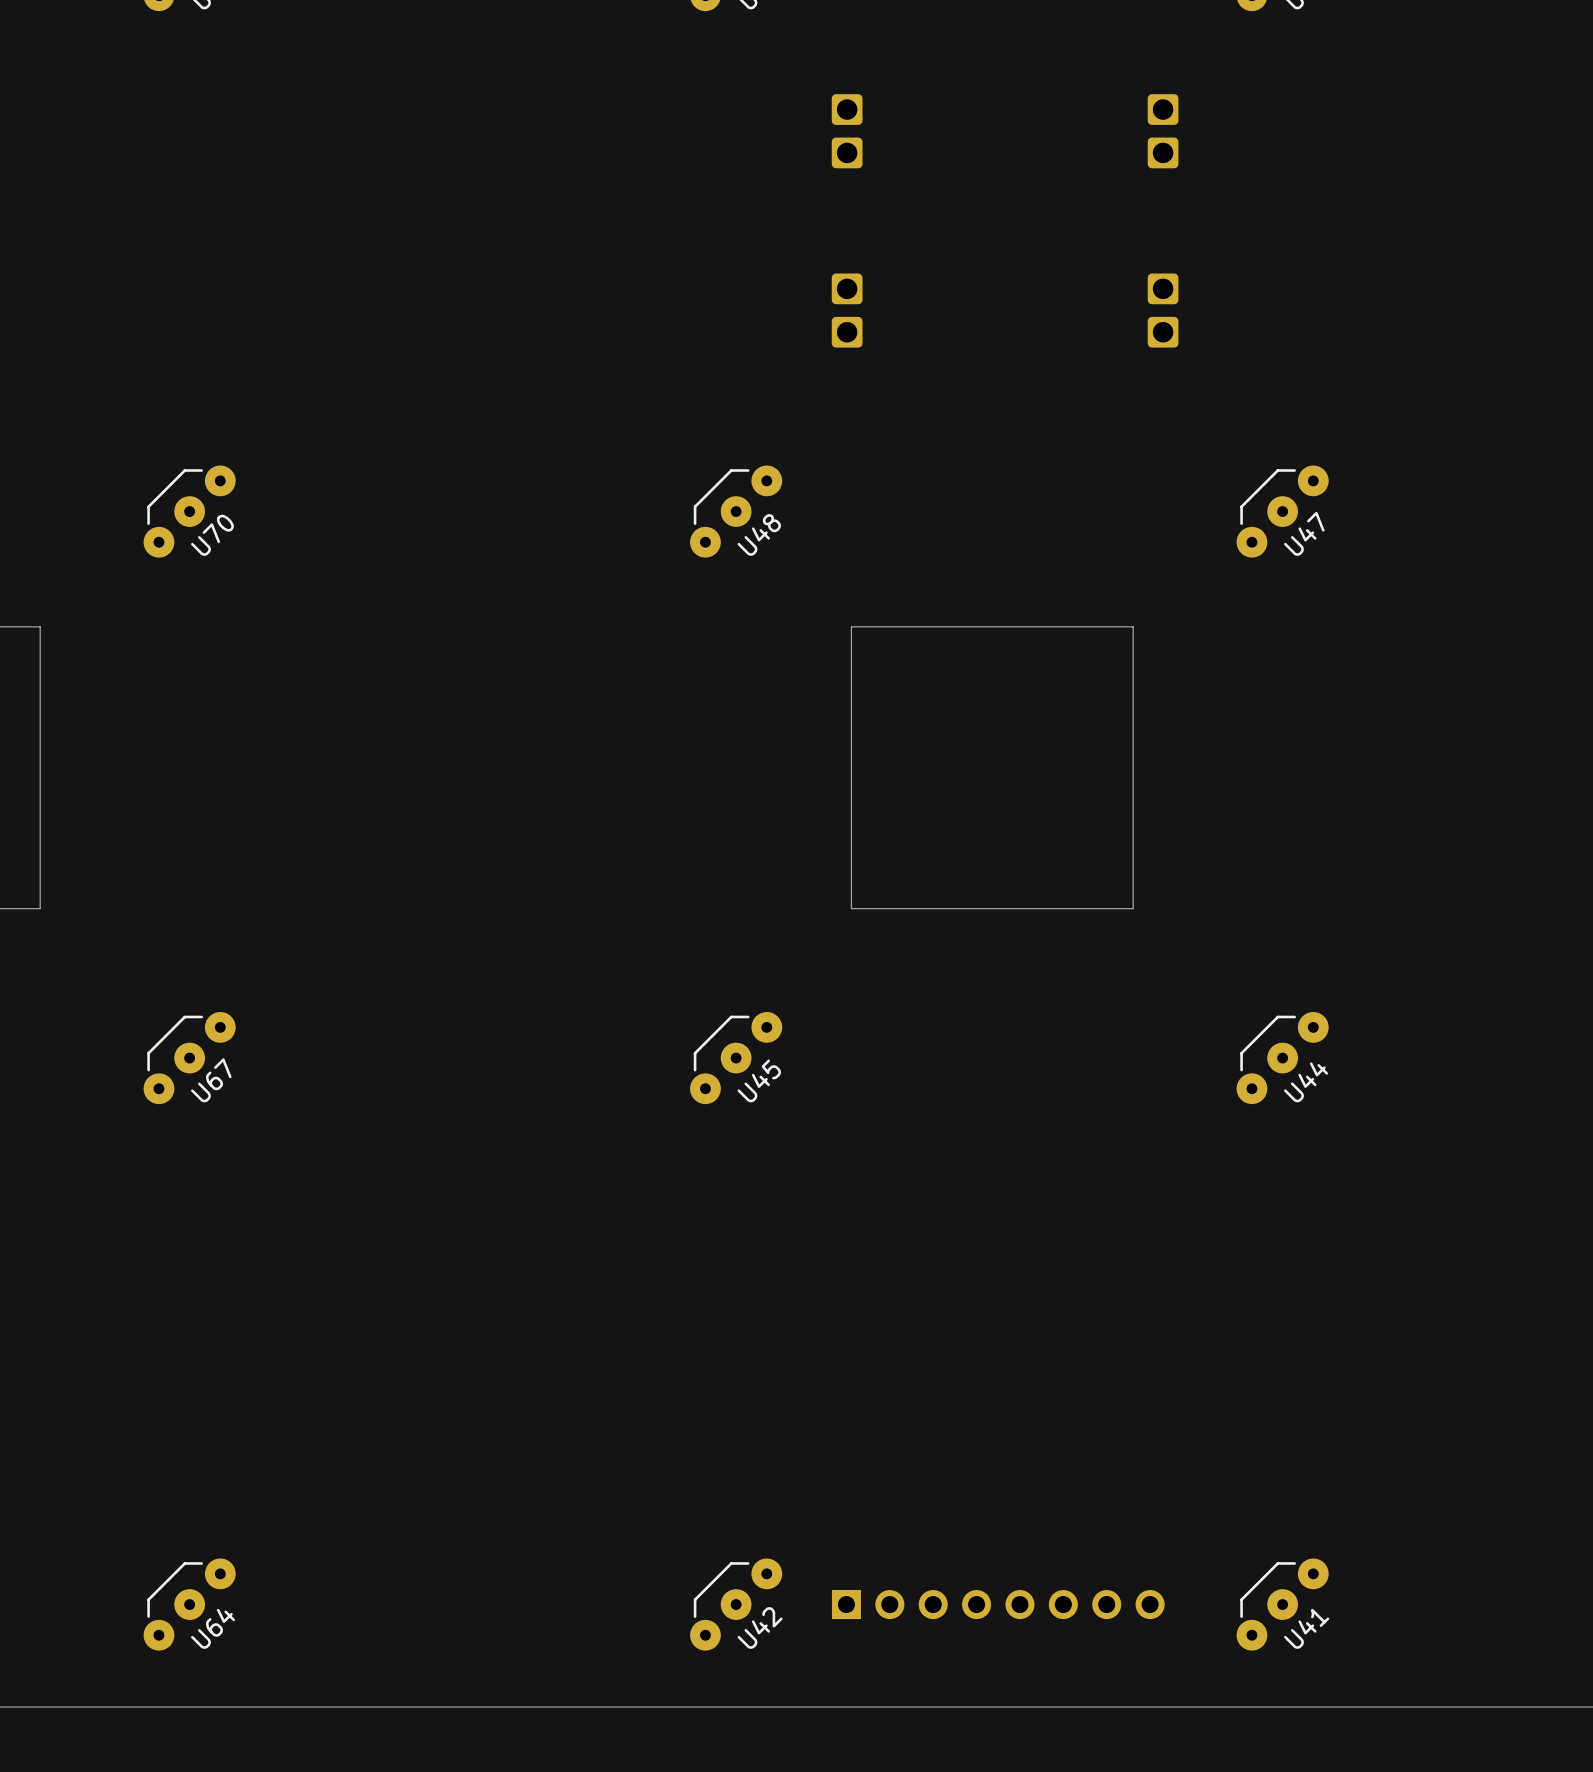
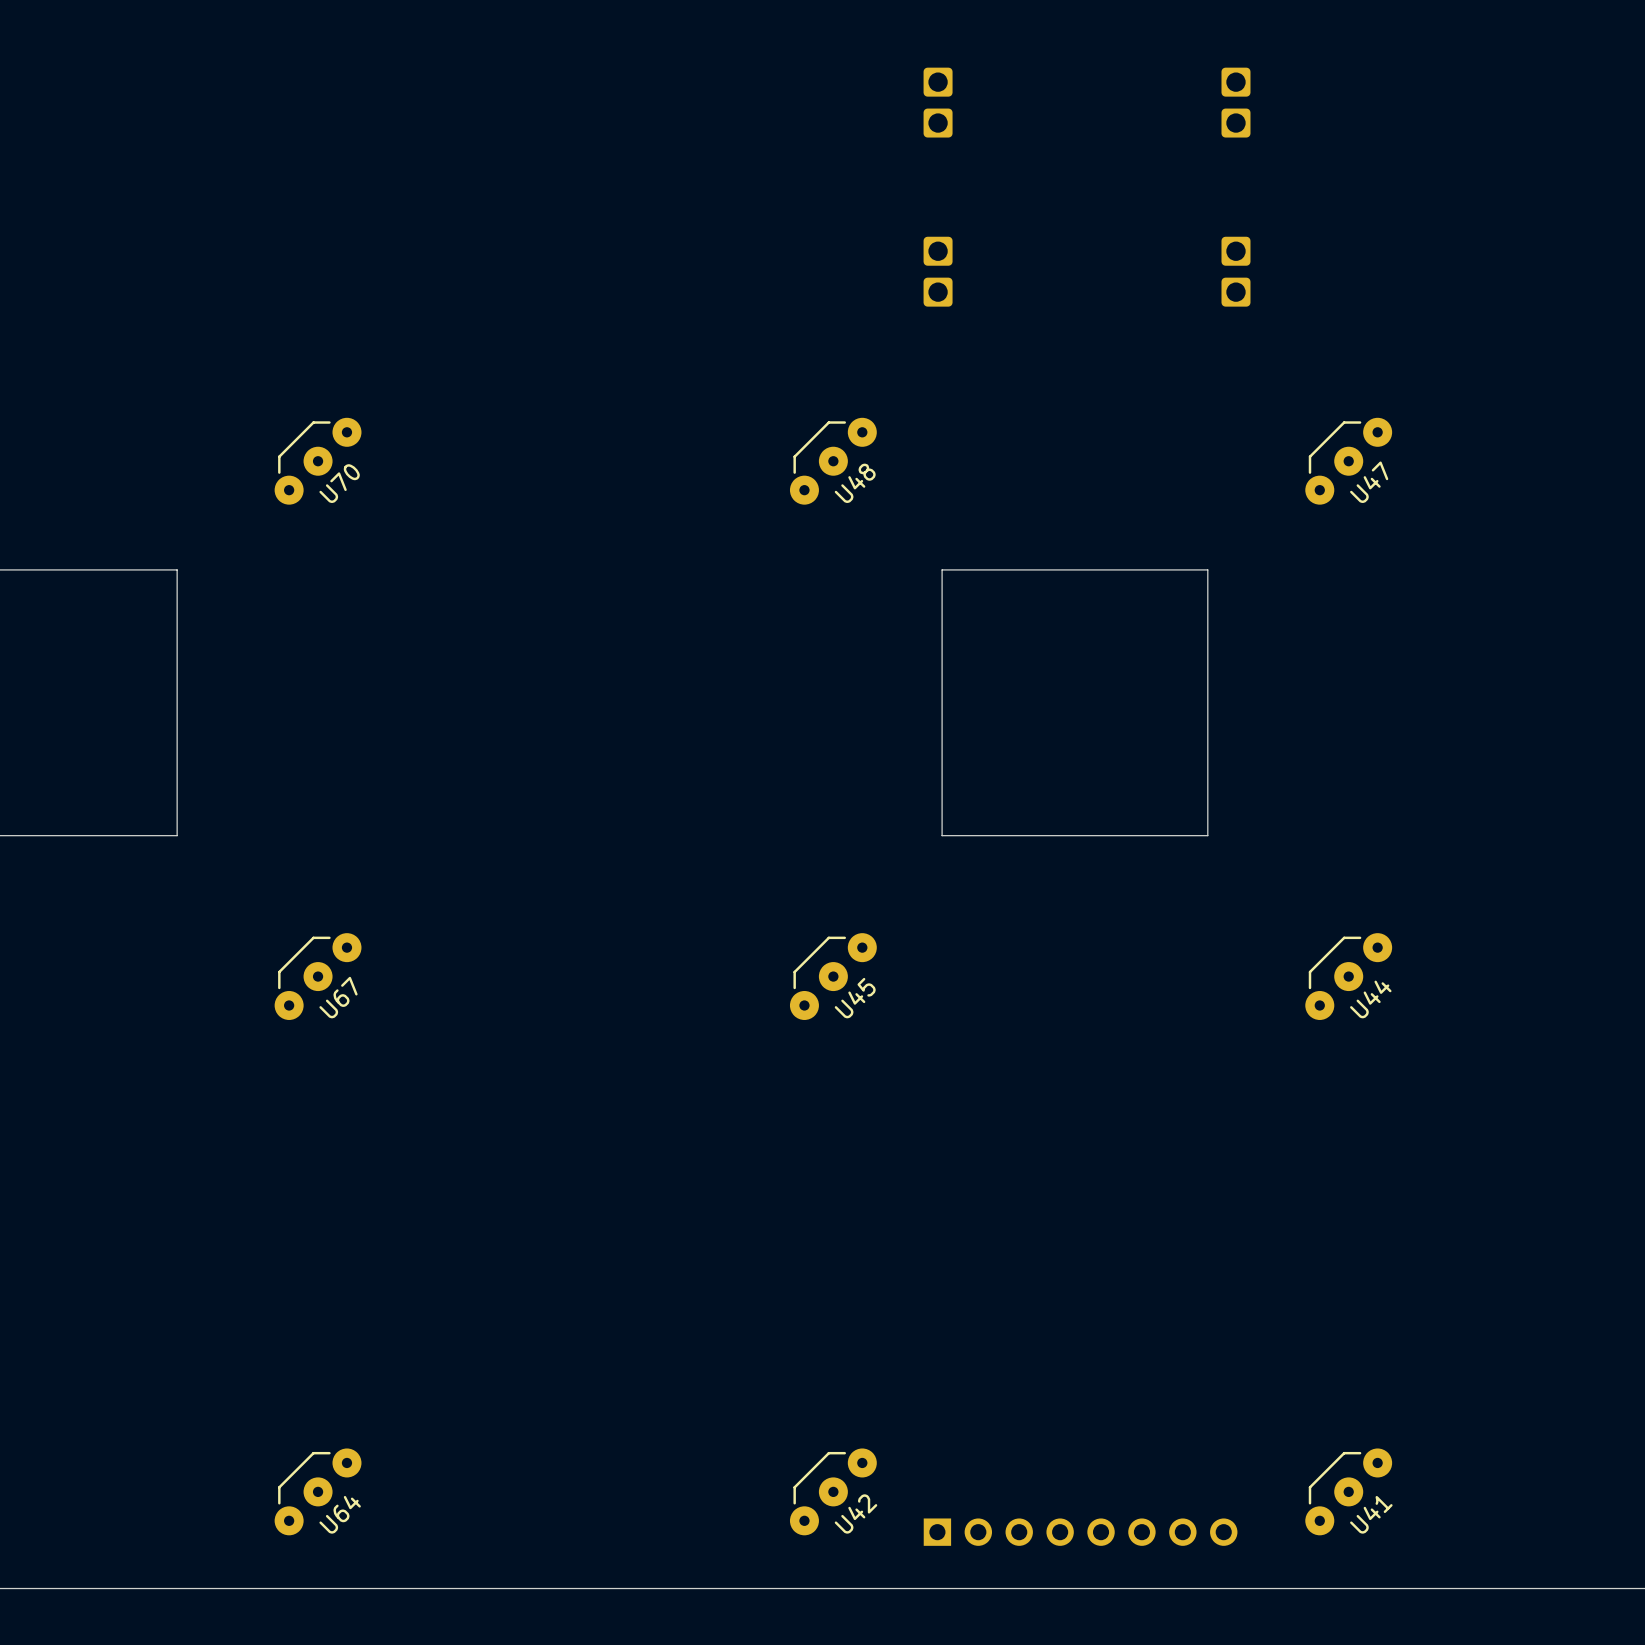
part position: (998, 1604) -> (1080, 1532)

